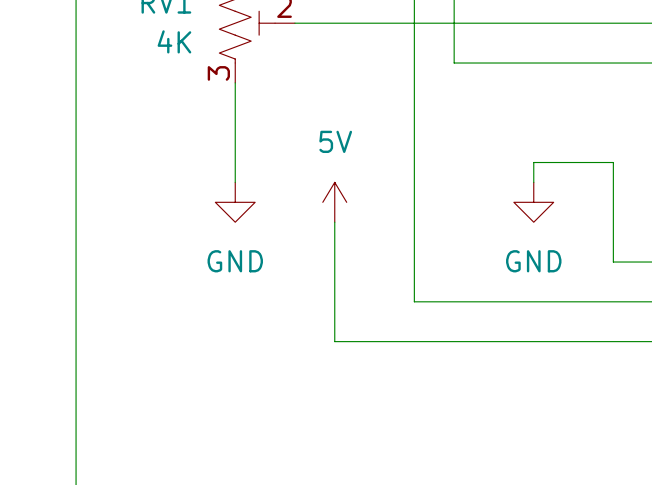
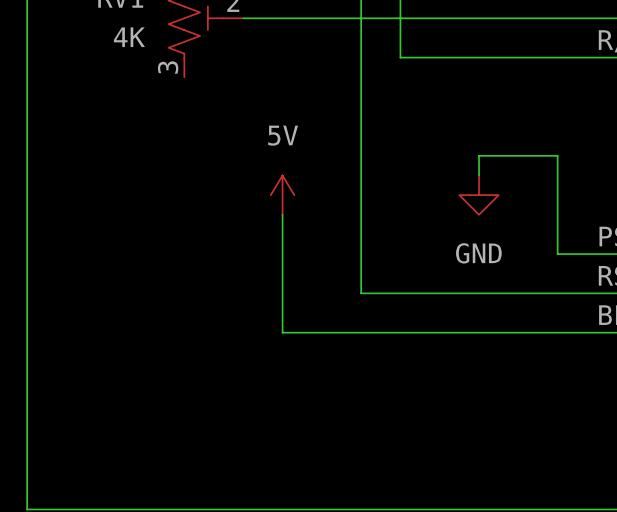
wire: (235, 82) (235, 182) -> none
power symbol: GND (235, 202) -> none

